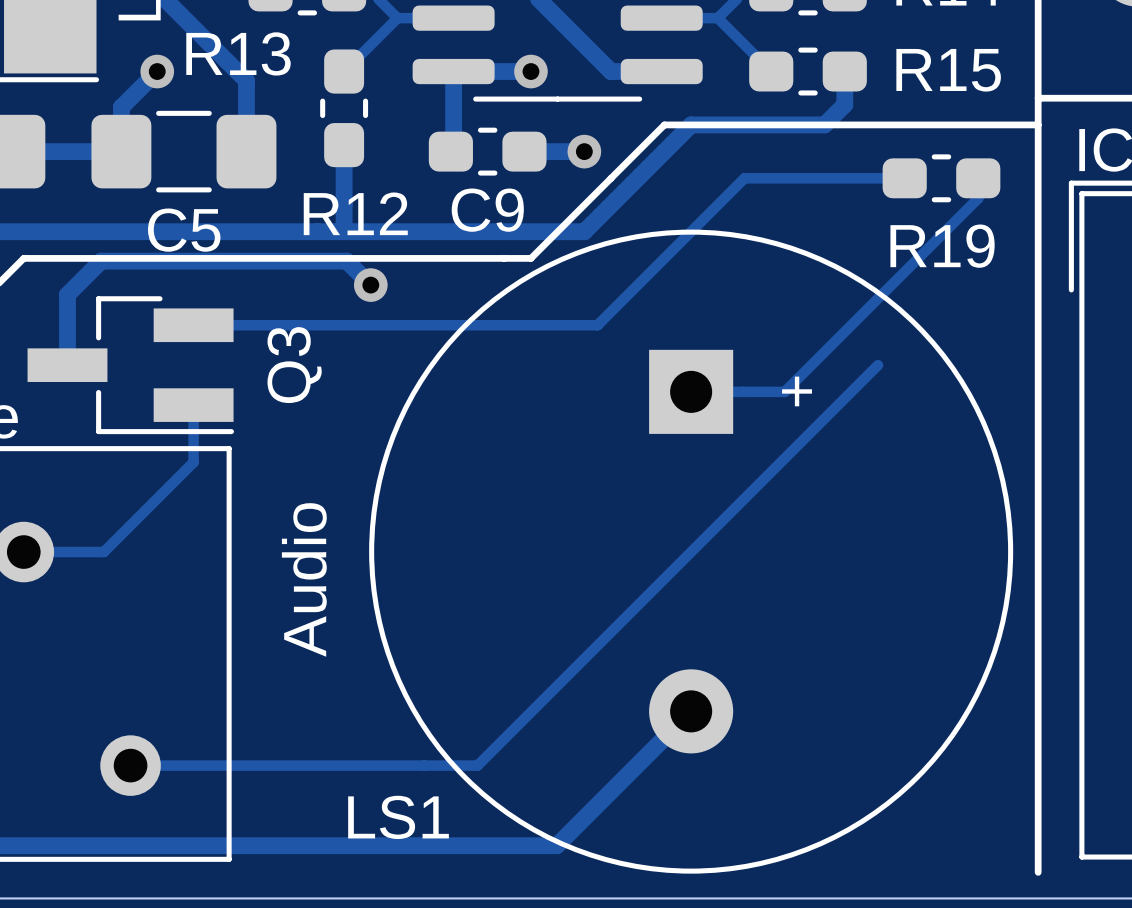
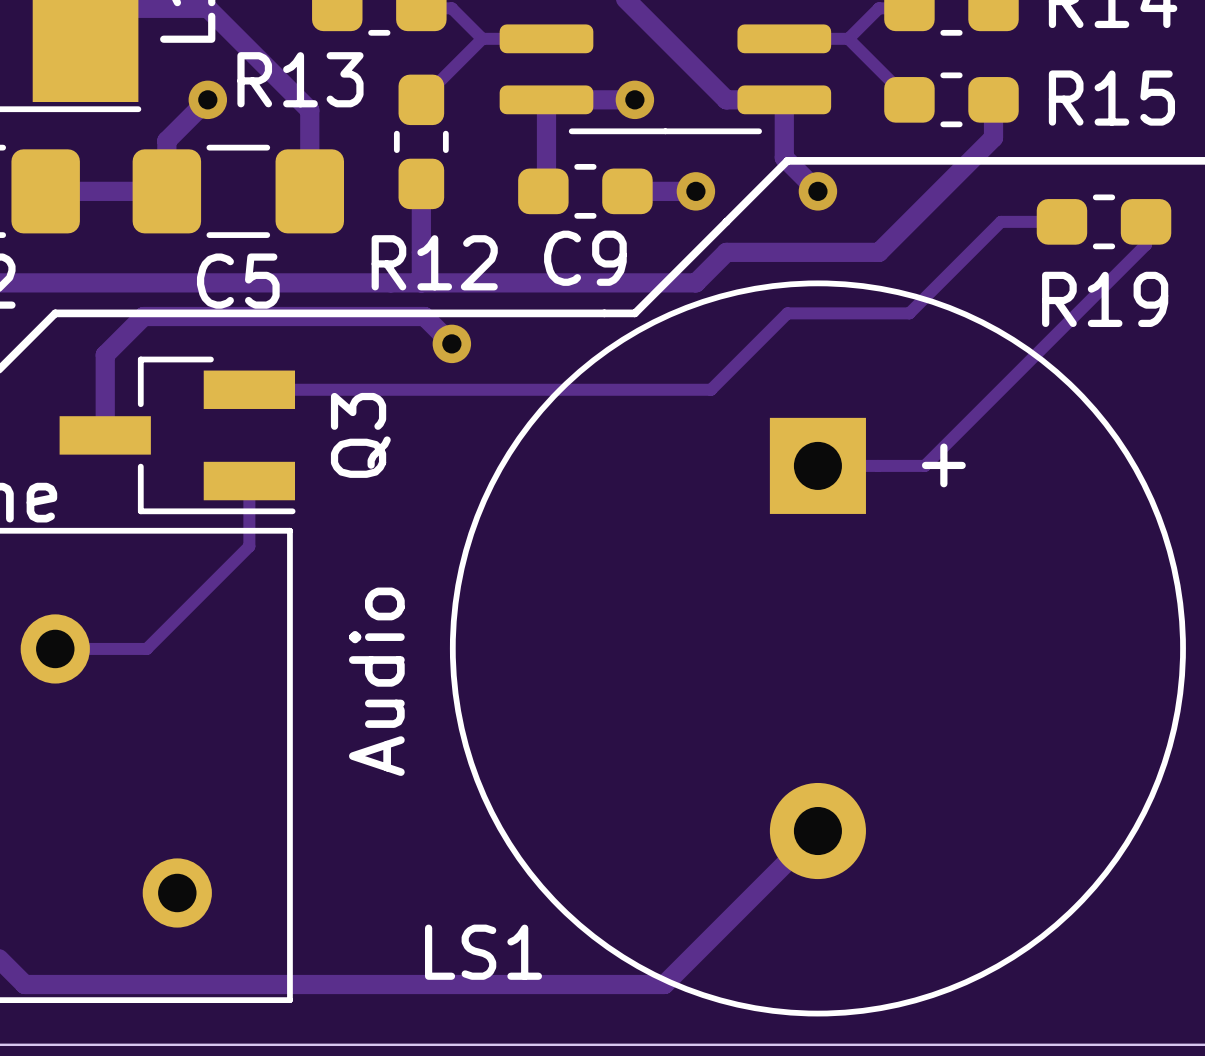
track: none -> (784, 99) (784, 157) (817, 191)
track: (824, 124) (691, 124) (611, 205) -> (970, 160) (878, 252) (726, 252)
via: none -> (817, 191)
track: (851, 178) (744, 178) (664, 258) -> (1000, 221) (909, 313) (787, 313)
track: (878, 365) (477, 765) (130, 765) -> none

